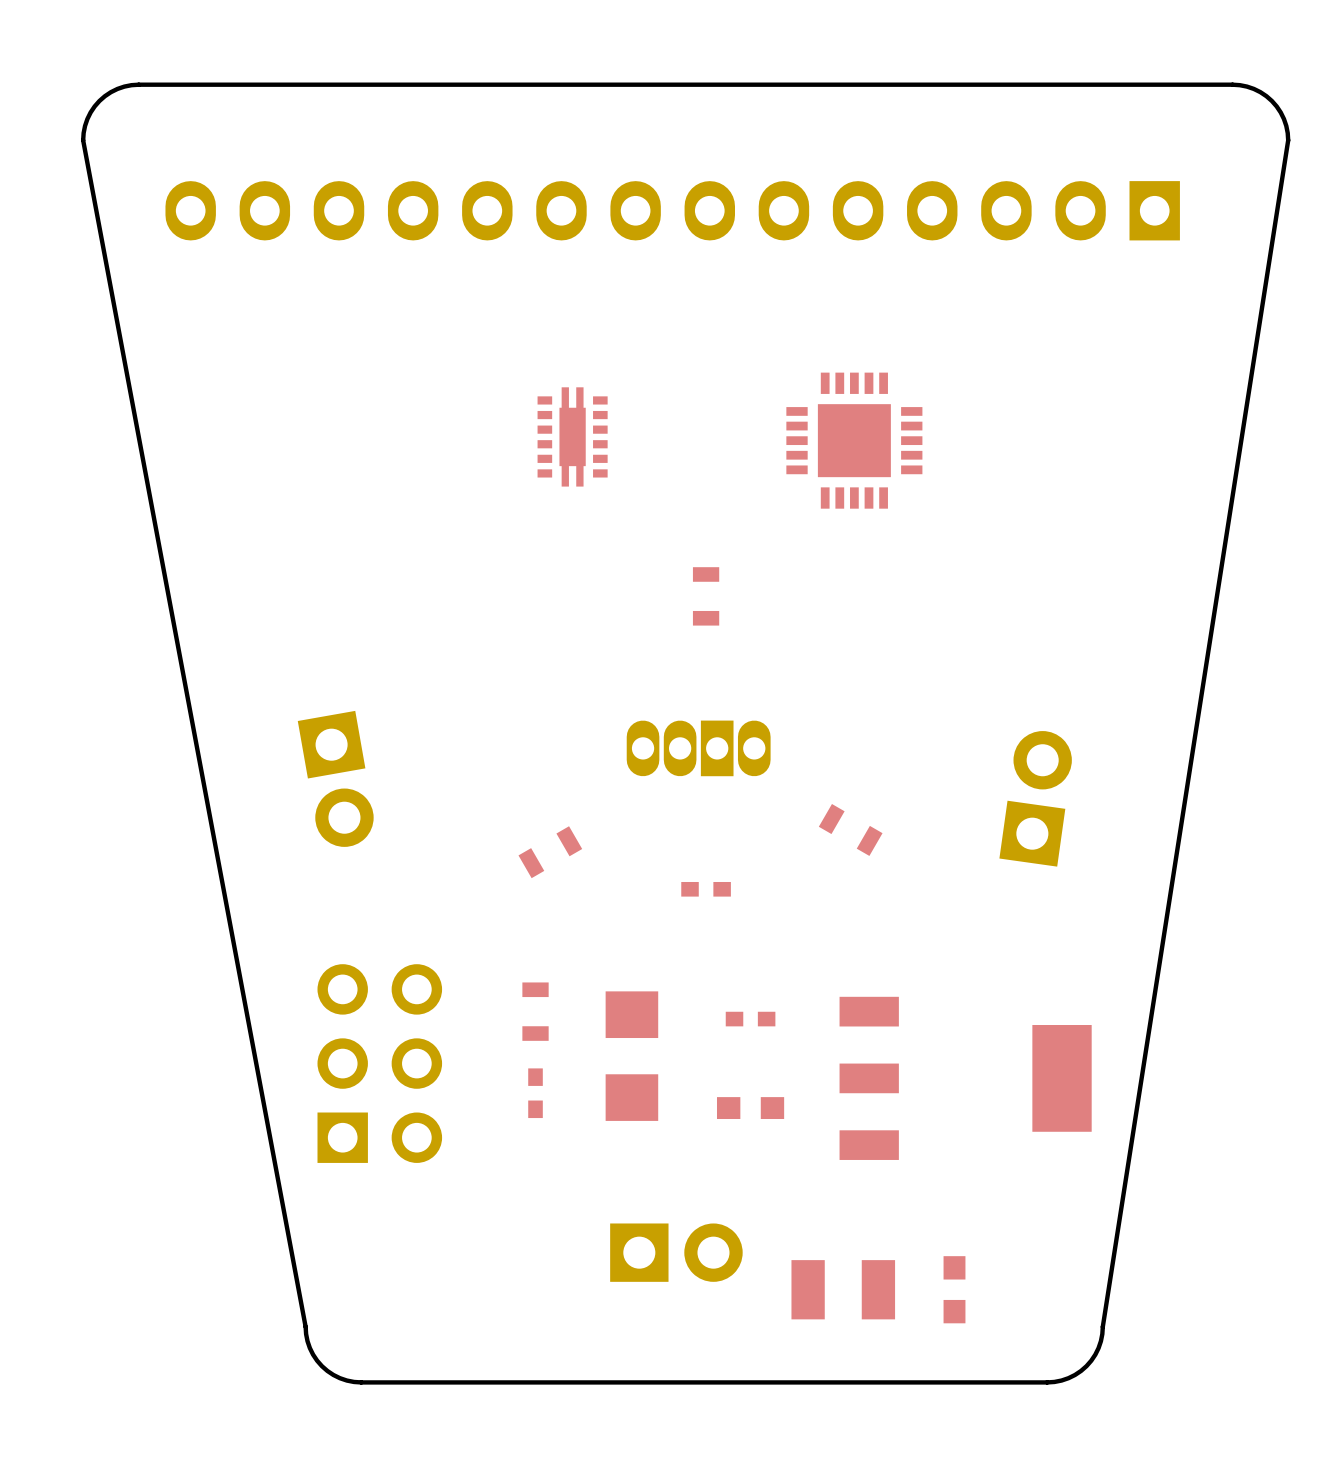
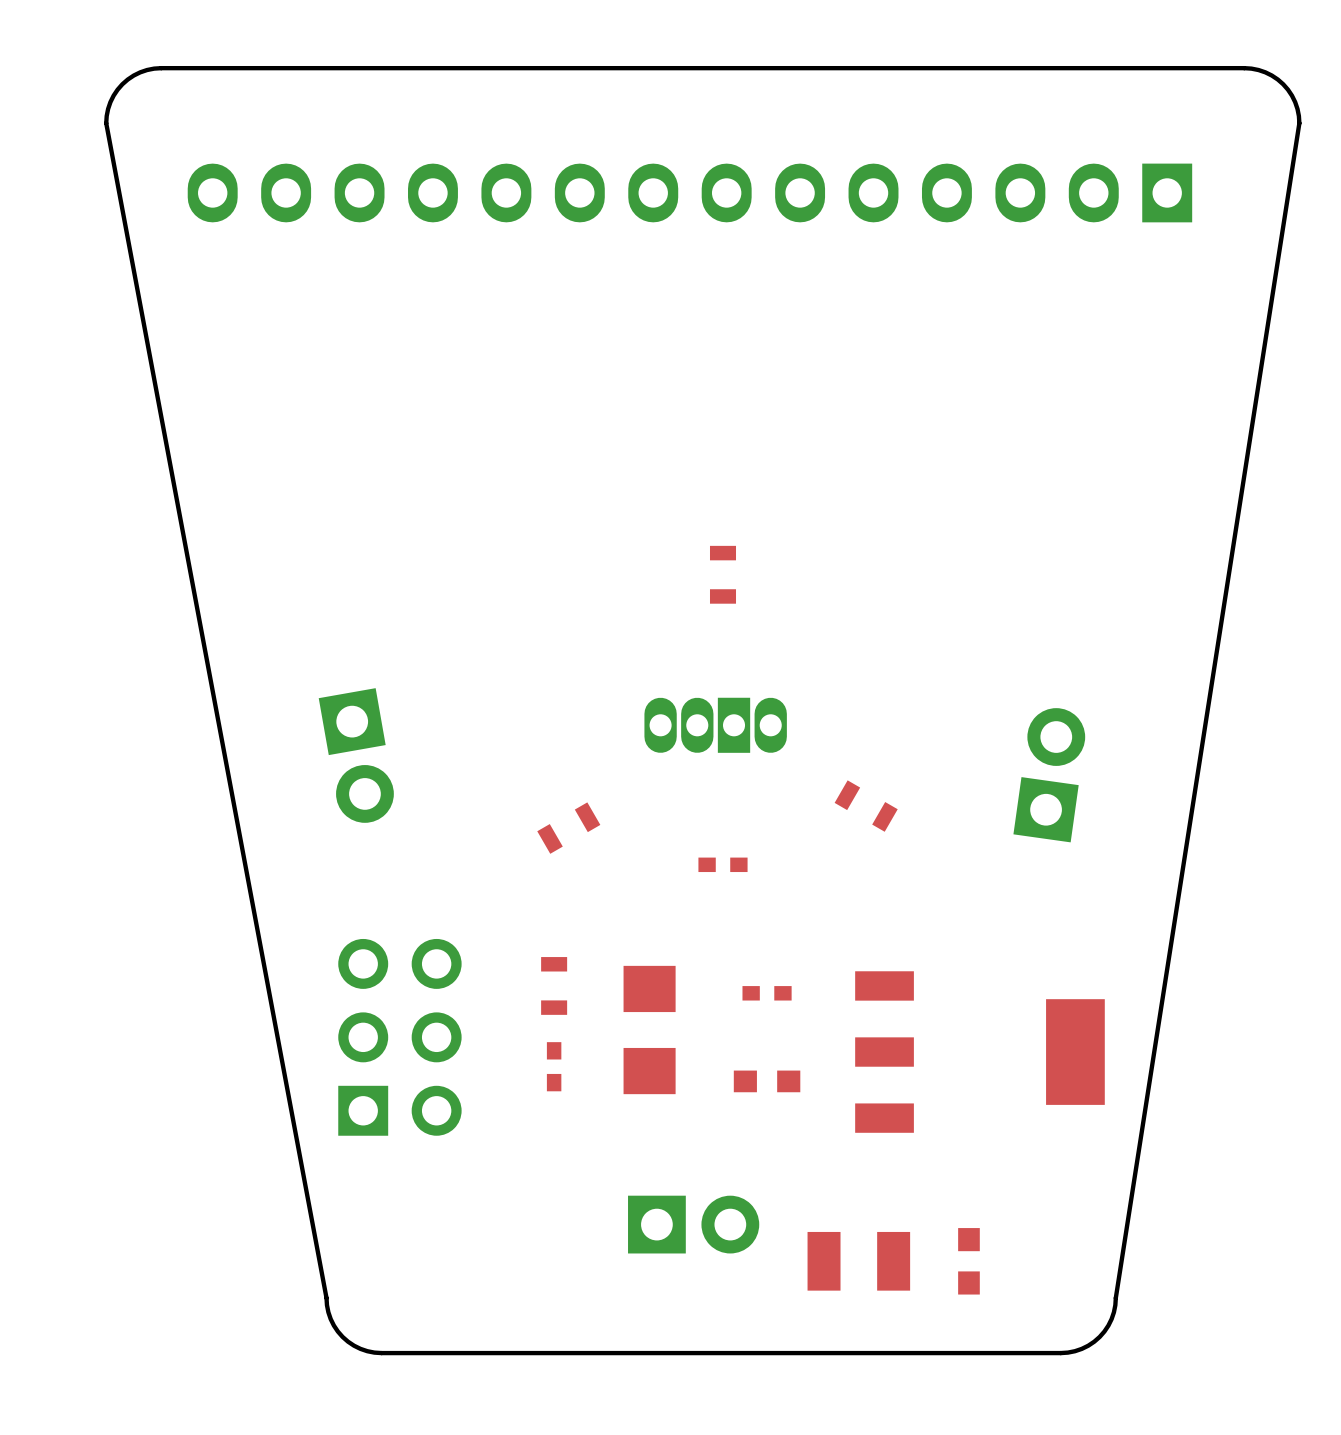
part: (572, 436) -> none
part: (854, 440) -> none

